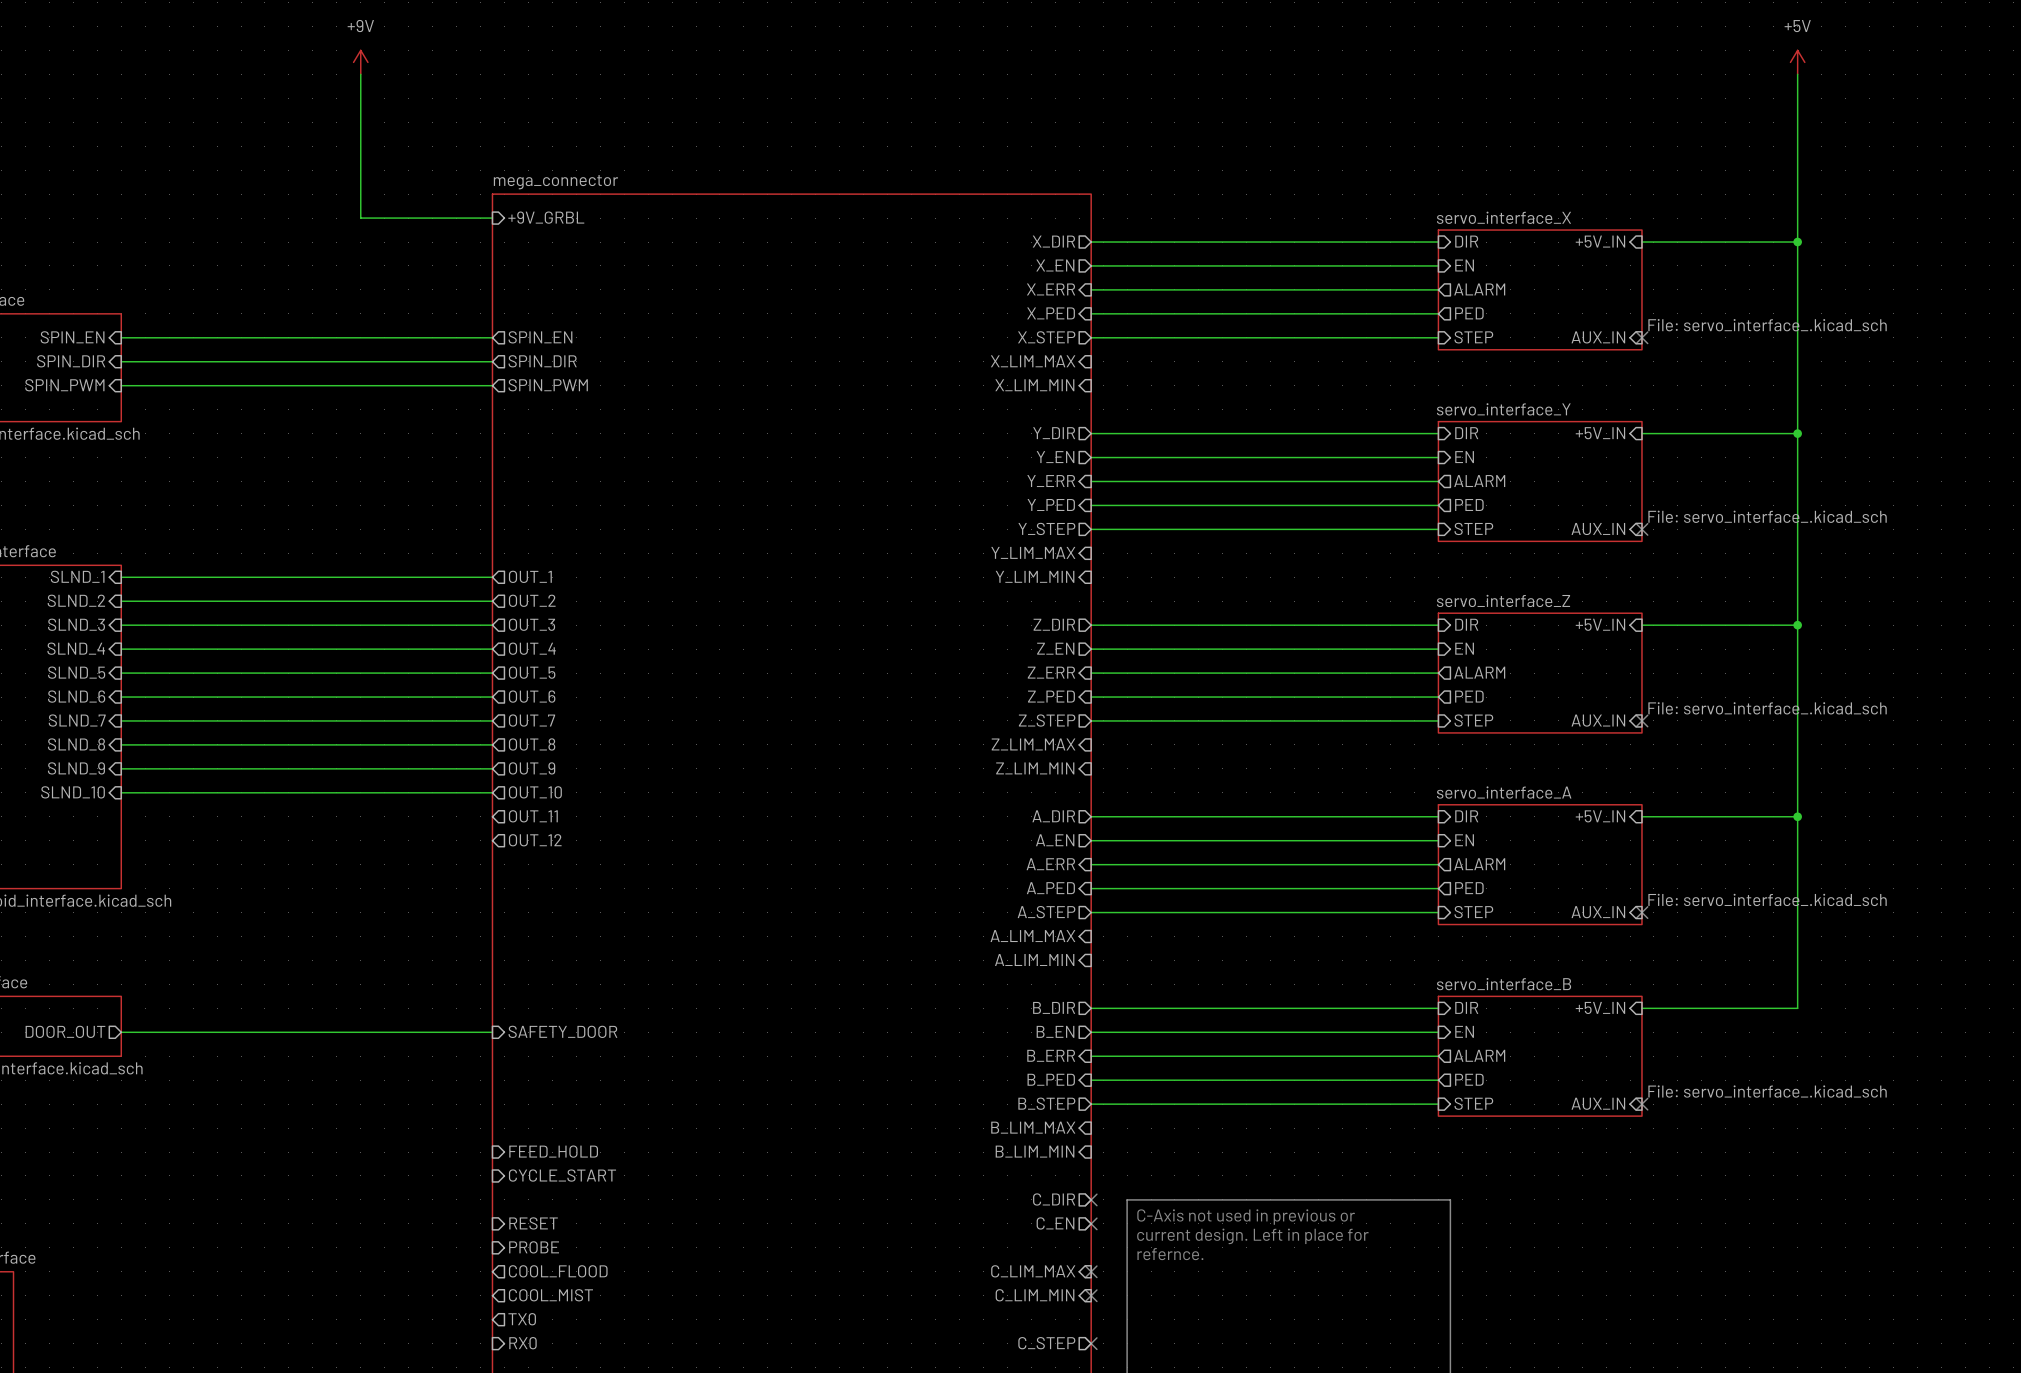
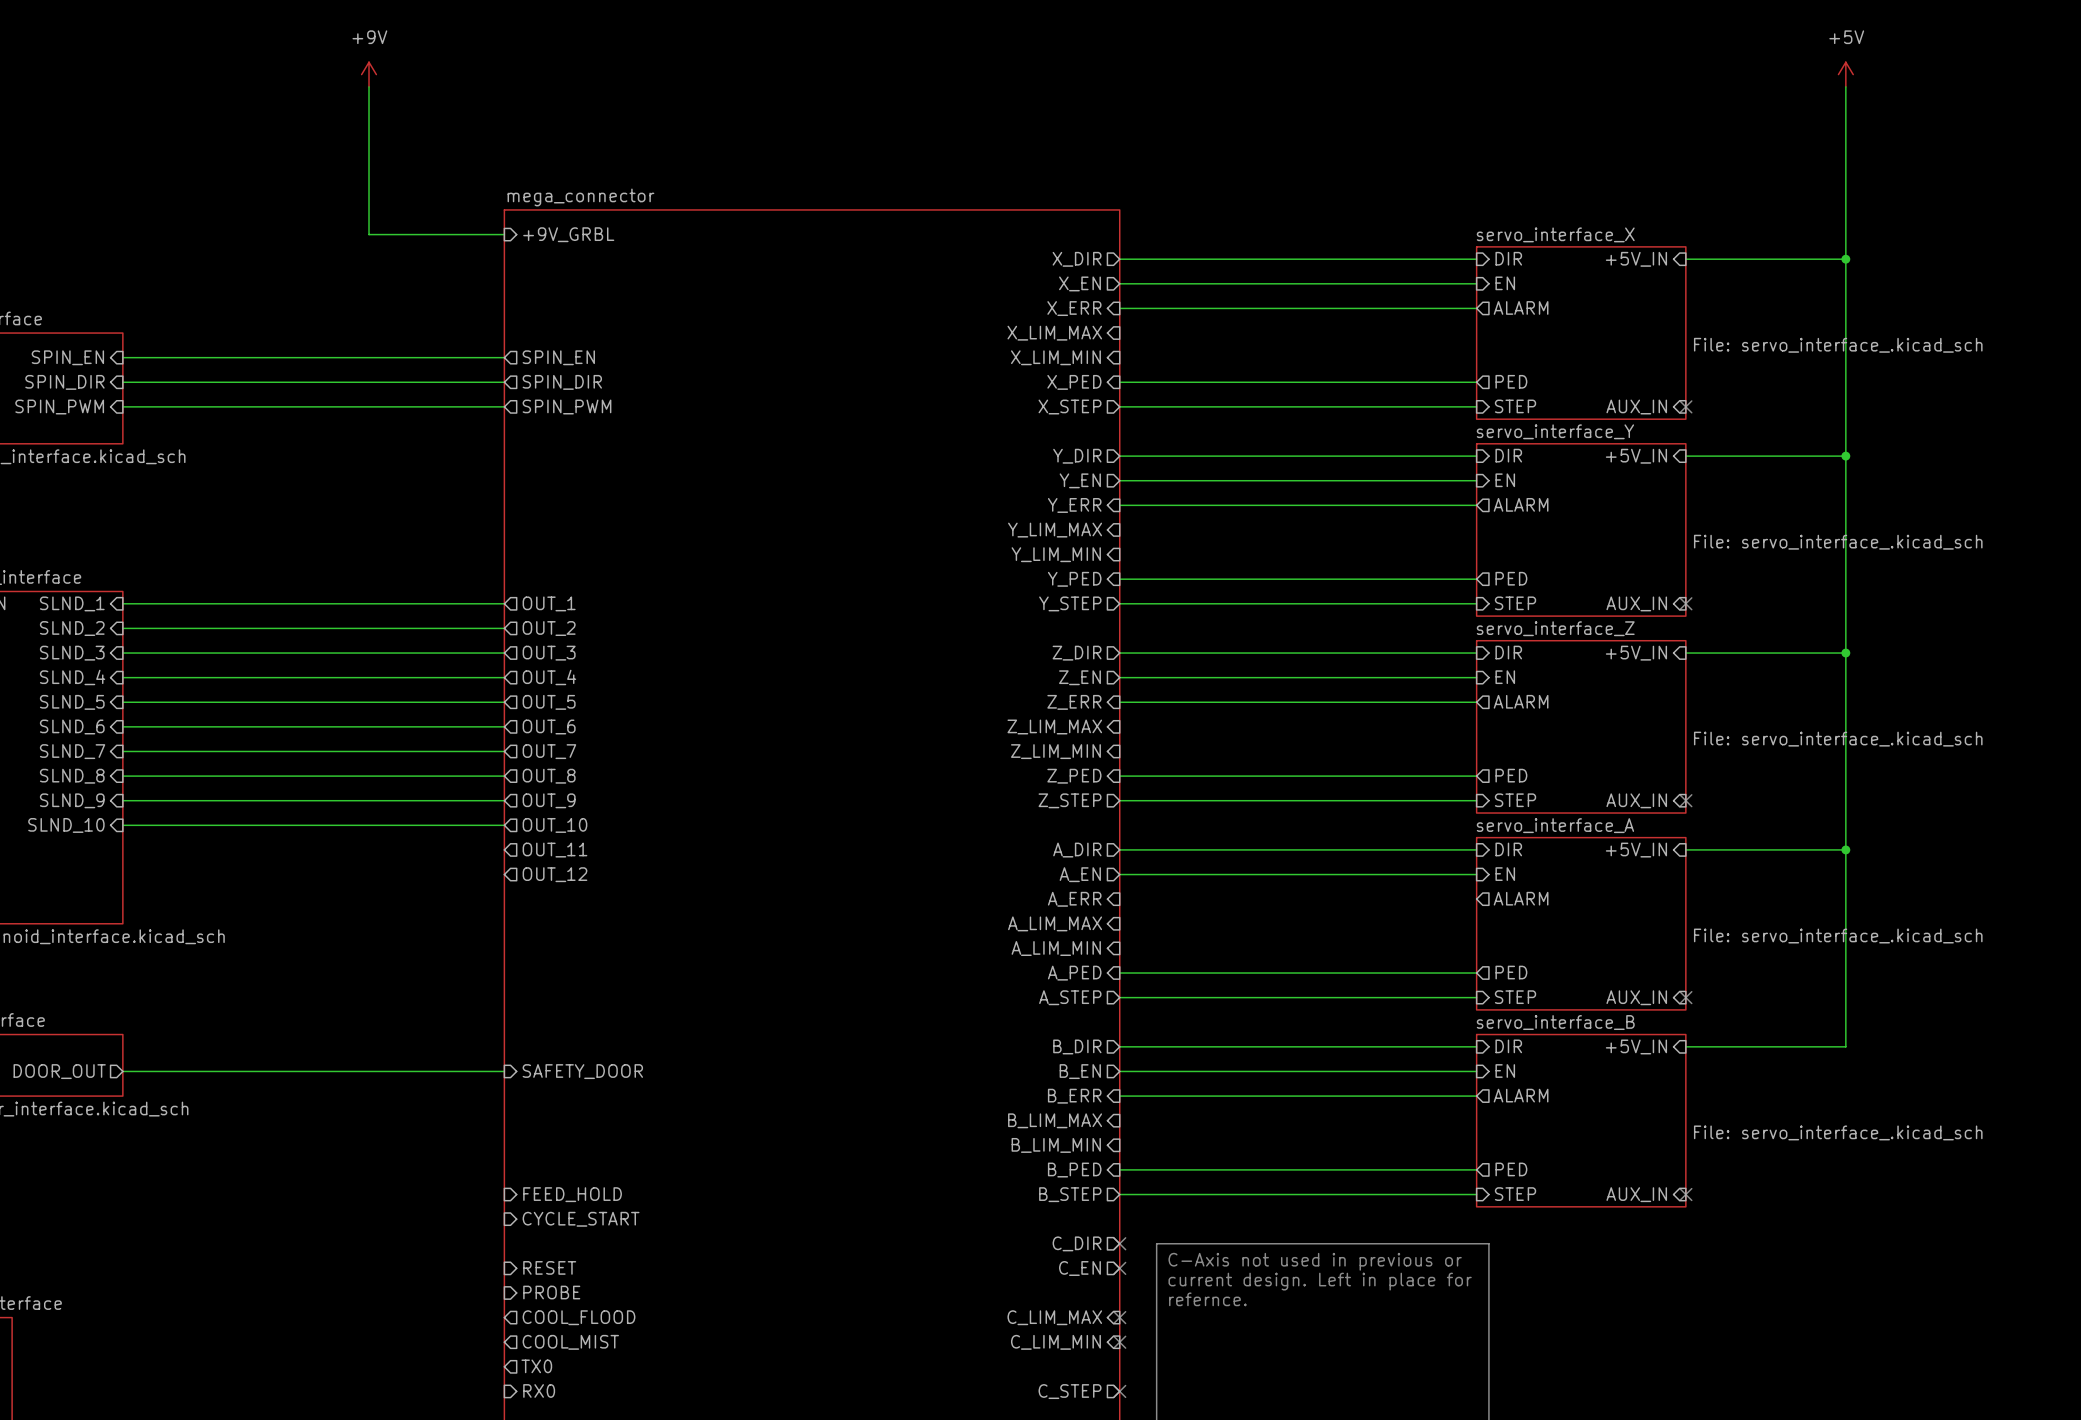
sheet servo_interface_X: File: servo_interface_.kicad_sch (1540, 289) -> none
sheet pin: X_PED (1051, 313) -> X_LIM_MAX (1054, 333)
wire: (1091, 313) (1438, 313) -> (1119, 382) (1476, 382)
sheet pin position: PED (1469, 313) -> PED (1511, 381)
sheet servo_interface_X: none -> File: servo_interface_.kicad_sch (1581, 333)
sheet pin shape: output (1046, 337) -> input (1055, 357)
sheet pin: X_STEP (1046, 337) -> X_LIM_MIN (1055, 357)
wire: (1091, 337) (1438, 337) -> (1119, 406) (1476, 406)
sheet pin position: STEP (1473, 337) -> STEP (1515, 406)
sheet pin position: AUX_IN (1598, 337) -> AUX_IN (1636, 407)
no-connect mark position: (1641, 337) -> (1685, 406)
sheet pin: X_LIM_MAX (1033, 361) -> X_PED (1074, 382)
sheet pin shape: input (1034, 385) -> output (1070, 407)
sheet pin: X_LIM_MIN (1034, 385) -> X_STEP (1070, 407)
sheet servo_interface_Y: File: servo_interface_.kicad_sch (1540, 481) -> none
sheet pin: Y_PED (1051, 504) -> Y_LIM_MAX (1055, 530)
sheet pin position: PED (1469, 504) -> PED (1511, 578)
wire: (1091, 505) (1438, 505) -> (1119, 579) (1476, 579)
sheet servo_interface_Y: none -> File: servo_interface_.kicad_sch (1581, 529)
sheet pin shape: output (1046, 528) -> input (1056, 554)
sheet pin: Y_STEP (1046, 528) -> Y_LIM_MIN (1056, 554)
sheet pin position: STEP (1473, 528) -> STEP (1515, 603)
wire: (1091, 529) (1438, 529) -> (1119, 603) (1476, 603)
sheet pin position: AUX_IN (1598, 529) -> AUX_IN (1636, 603)
no-connect mark position: (1641, 529) -> (1685, 603)
sheet pin: Y_LIM_MAX (1033, 552) -> Y_PED (1074, 579)
sheet pin shape: input (1035, 576) -> output (1070, 603)
sheet pin: Y_LIM_MIN (1035, 576) -> Y_STEP (1070, 603)
sheet servo_interface_Z: File: servo_interface_.kicad_sch (1540, 673) -> none
sheet pin: Z_PED (1051, 696) -> Z_LIM_MAX (1054, 726)
sheet pin position: PED (1469, 696) -> PED (1511, 775)
wire: (1091, 697) (1438, 697) -> (1119, 776) (1476, 776)
sheet servo_interface_Z: none -> File: servo_interface_.kicad_sch (1581, 726)
sheet pin shape: output (1047, 720) -> input (1055, 751)
sheet pin: Z_STEP (1047, 720) -> Z_LIM_MIN (1055, 751)
wire: (1091, 720) (1438, 720) -> (1119, 800) (1476, 800)
sheet pin position: STEP (1473, 720) -> STEP (1515, 800)
sheet pin position: AUX_IN (1598, 720) -> AUX_IN (1636, 800)
no-connect mark position: (1641, 720) -> (1685, 800)
sheet pin: Z_LIM_MAX (1033, 744) -> Z_PED (1074, 776)
sheet pin shape: input (1035, 768) -> output (1070, 800)
sheet pin: Z_LIM_MIN (1035, 768) -> Z_STEP (1070, 800)
wire: (1091, 864) (1438, 864) -> none
sheet servo_interface_A: File: servo_interface_.kicad_sch (1540, 864) -> none
sheet pin: A_PED (1050, 888) -> A_LIM_MAX (1055, 923)
wire: (1091, 888) (1438, 888) -> (1119, 973) (1476, 973)
sheet pin position: PED (1469, 888) -> PED (1511, 972)
sheet servo_interface_A: none -> File: servo_interface_.kicad_sch (1581, 923)
sheet pin shape: output (1046, 912) -> input (1056, 948)
sheet pin: A_STEP (1046, 912) -> A_LIM_MIN (1056, 948)
wire: (1091, 912) (1438, 912) -> (1119, 997) (1476, 997)
sheet pin position: STEP (1473, 912) -> STEP (1515, 997)
sheet pin position: AUX_IN (1598, 912) -> AUX_IN (1636, 997)
no-connect mark position: (1641, 912) -> (1685, 997)
sheet pin: A_LIM_MAX (1032, 936) -> A_PED (1074, 973)
sheet pin shape: input (1034, 960) -> output (1070, 997)
sheet pin: A_LIM_MIN (1034, 960) -> A_STEP (1070, 997)
sheet servo_interface_B: File: servo_interface_.kicad_sch (1540, 1056) -> none
sheet pin: B_PED (1051, 1079) -> B_LIM_MAX (1055, 1120)
sheet pin position: PED (1469, 1079) -> PED (1511, 1169)
wire: (1091, 1080) (1438, 1080) -> (1119, 1169) (1476, 1169)
sheet servo_interface_B: none -> File: servo_interface_.kicad_sch (1581, 1120)
sheet pin shape: output (1046, 1103) -> input (1056, 1145)
sheet pin: B_STEP (1046, 1103) -> B_LIM_MIN (1056, 1145)
sheet pin position: STEP (1473, 1103) -> STEP (1515, 1194)
sheet pin position: AUX_IN (1598, 1103) -> AUX_IN (1636, 1194)
wire: (1091, 1104) (1438, 1104) -> (1119, 1194) (1476, 1194)
no-connect mark position: (1641, 1104) -> (1685, 1194)
sheet pin: B_LIM_MAX (1033, 1127) -> B_PED (1074, 1170)
sheet pin shape: input (1035, 1151) -> output (1070, 1194)
sheet pin: B_LIM_MIN (1035, 1151) -> B_STEP (1070, 1194)

